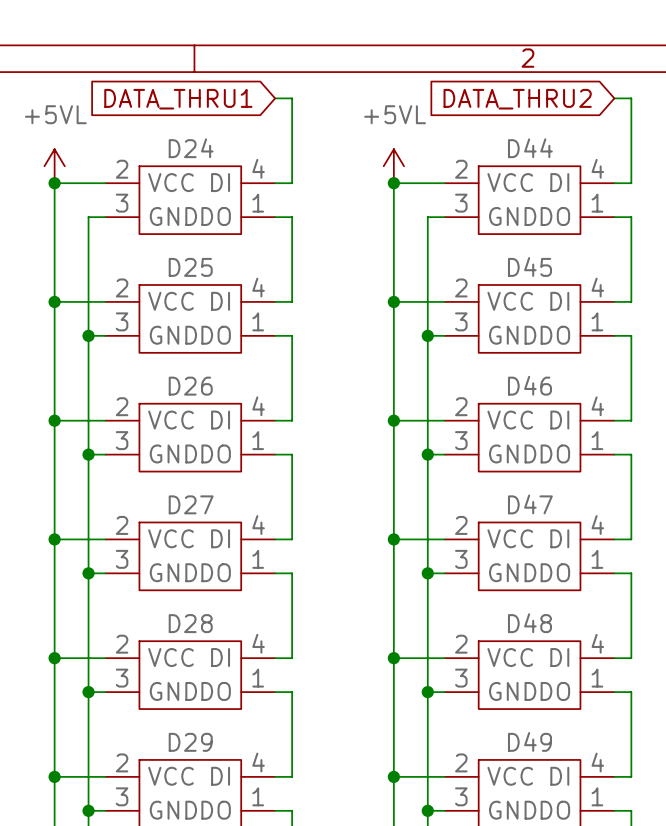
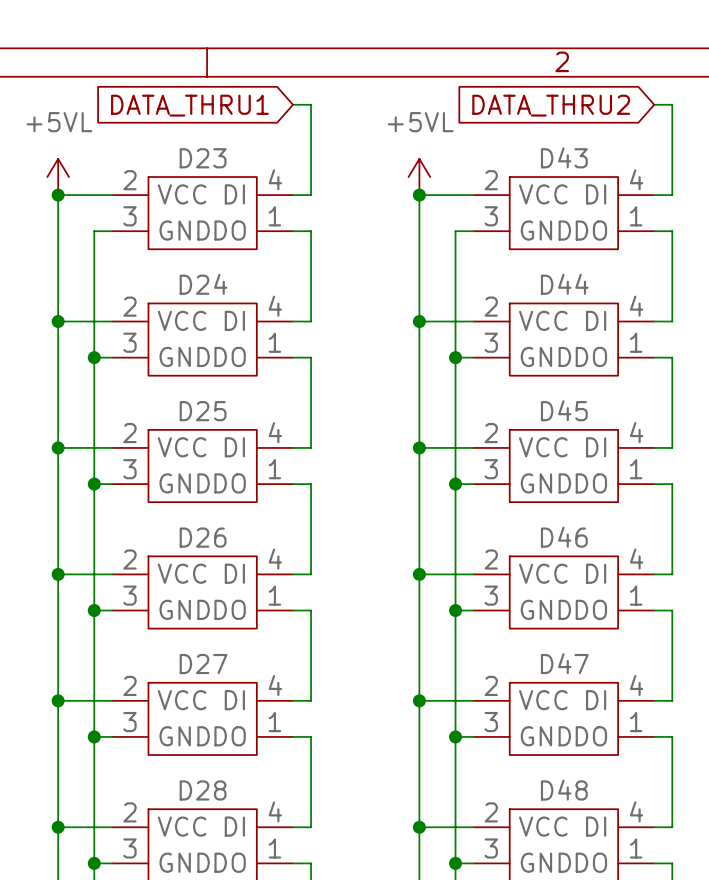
D24 name: D24 (191, 148) -> D23 (203, 158)
D44 name: D44 (530, 148) -> D43 (564, 157)
D45 name: D45 (529, 266) -> D44 (564, 284)
D25 name: D25 (190, 267) -> D24 (203, 284)
D46 name: D46 (529, 385) -> D45 (564, 410)
D26 name: D26 (190, 386) -> D25 (203, 411)
D27 name: D27 (191, 504) -> D26 (203, 537)
D47 name: D47 (530, 504) -> D46 (564, 537)
D28 name: D28 (190, 623) -> D27 (203, 664)
D48 name: D48 (529, 623) -> D47 (564, 663)
D49 name: D49 (529, 741) -> D48 (564, 790)
D29 name: D29 (190, 742) -> D28 (203, 790)

